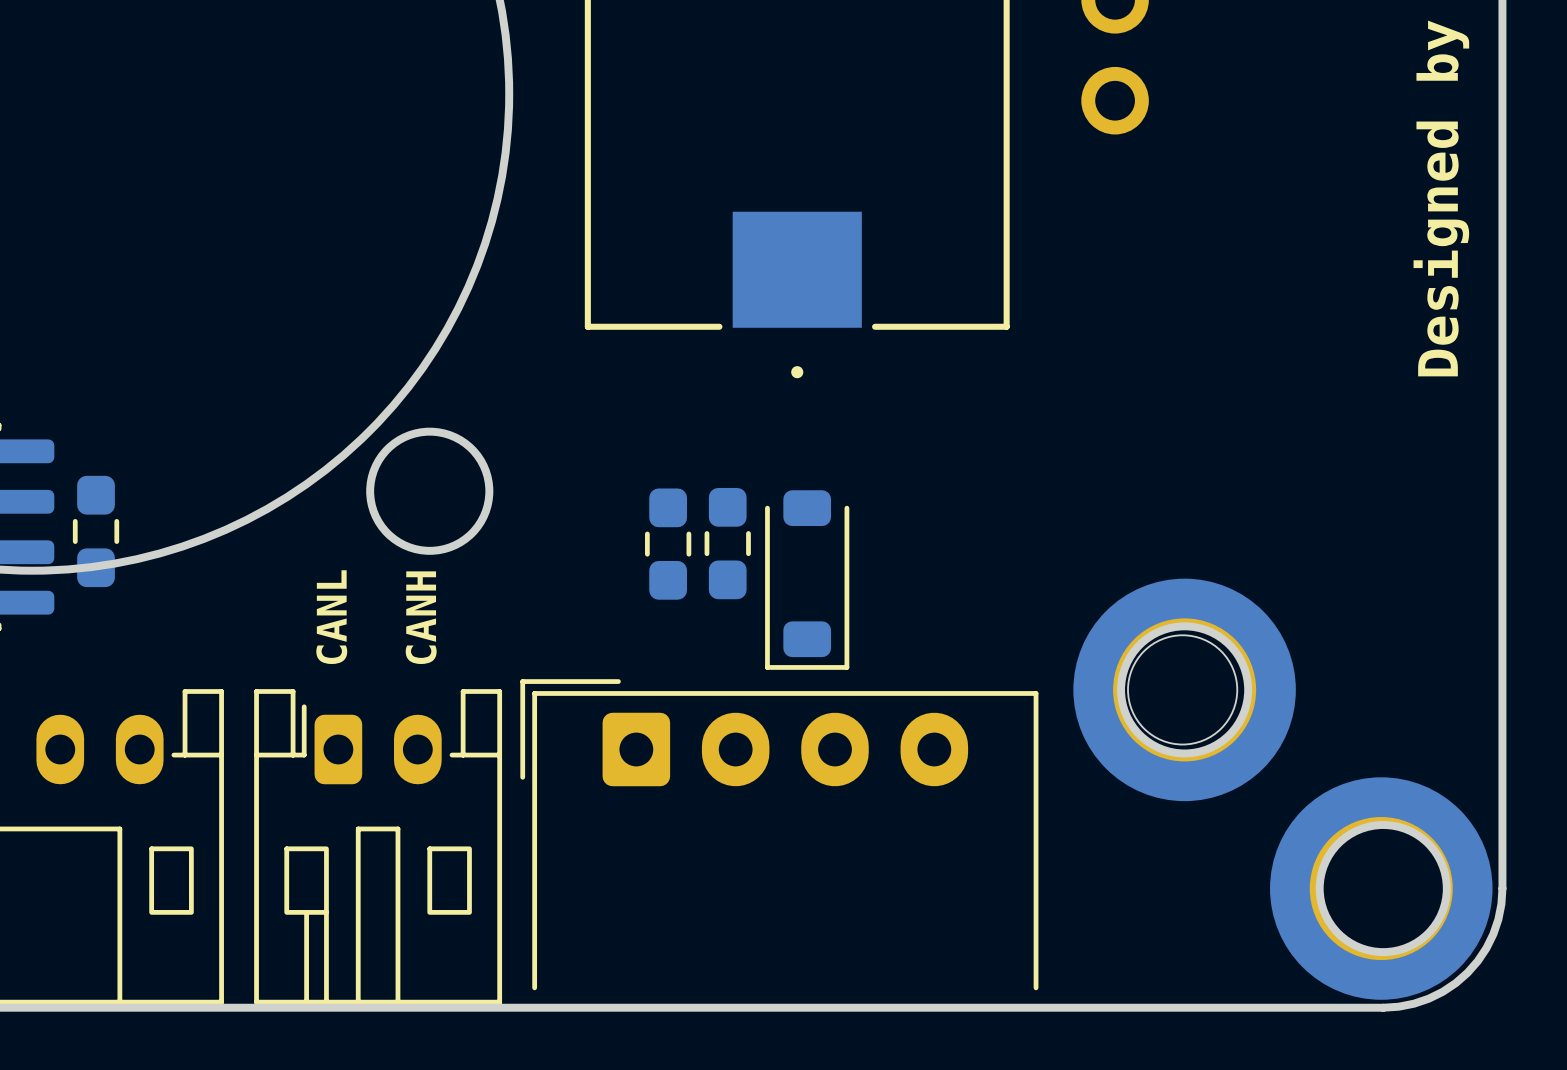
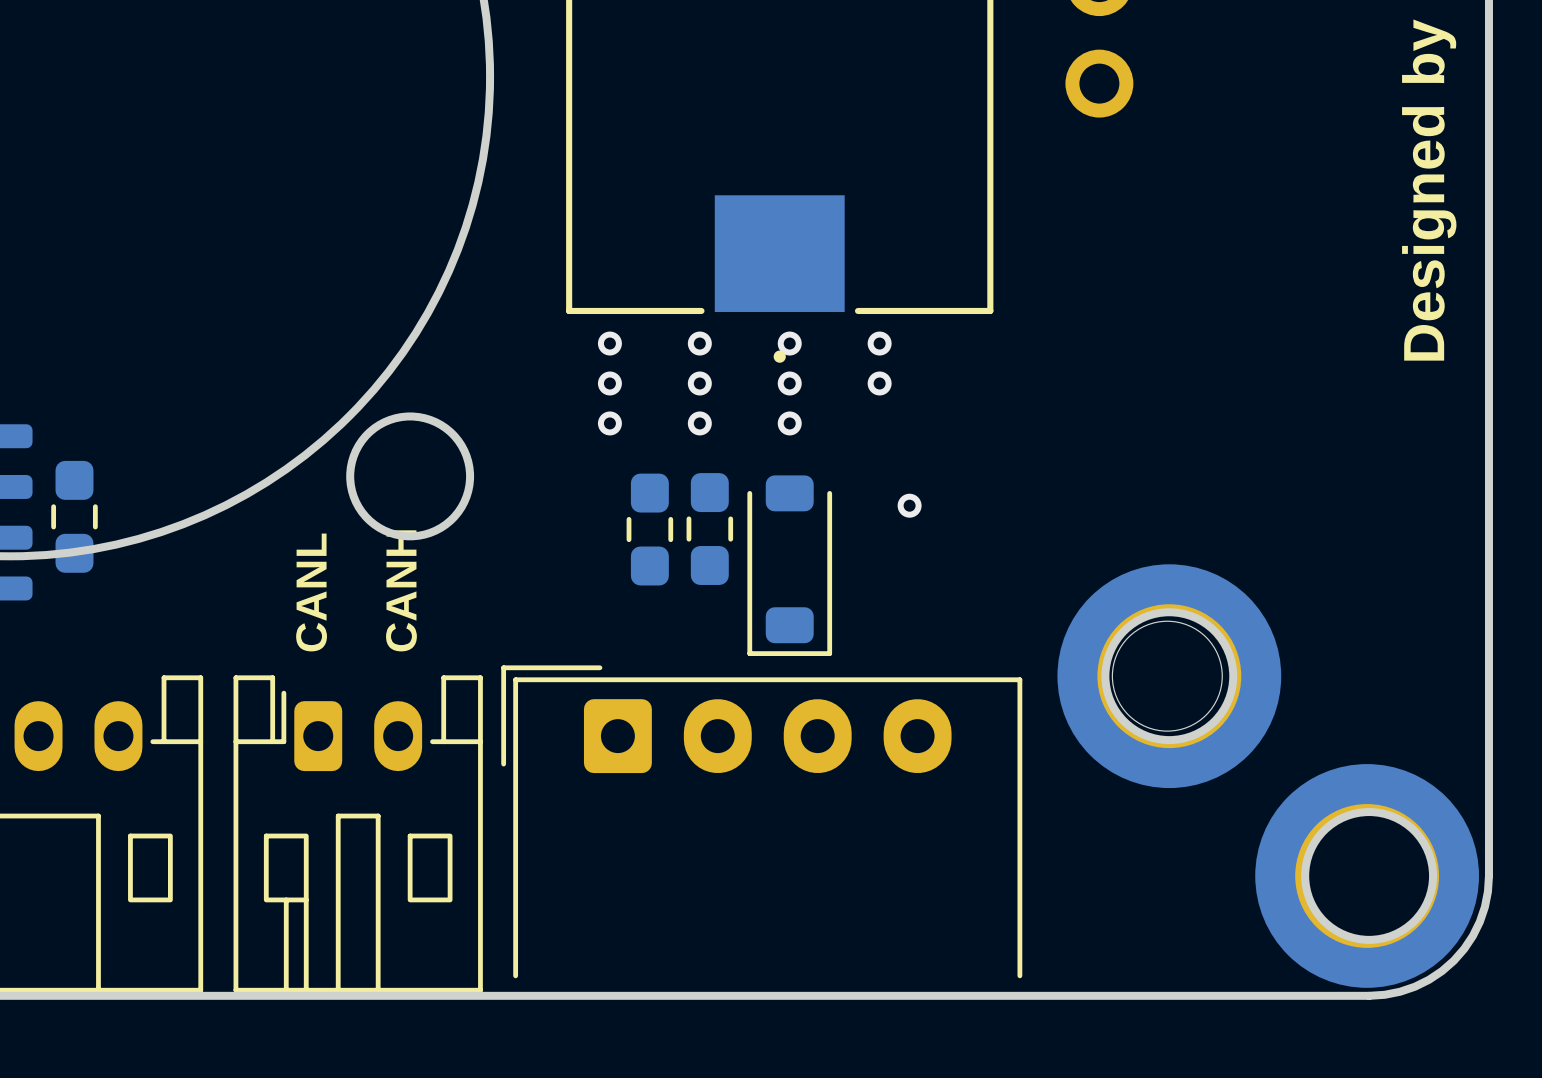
via: none -> (609, 343)
via: none -> (699, 343)
via: none -> (789, 343)
via: none -> (879, 343)
via: none -> (609, 383)
via: none -> (699, 383)
via: none -> (789, 383)
via: none -> (879, 383)
via: none -> (609, 423)
via: none -> (699, 423)
via: none -> (789, 423)
via: none -> (909, 505)

